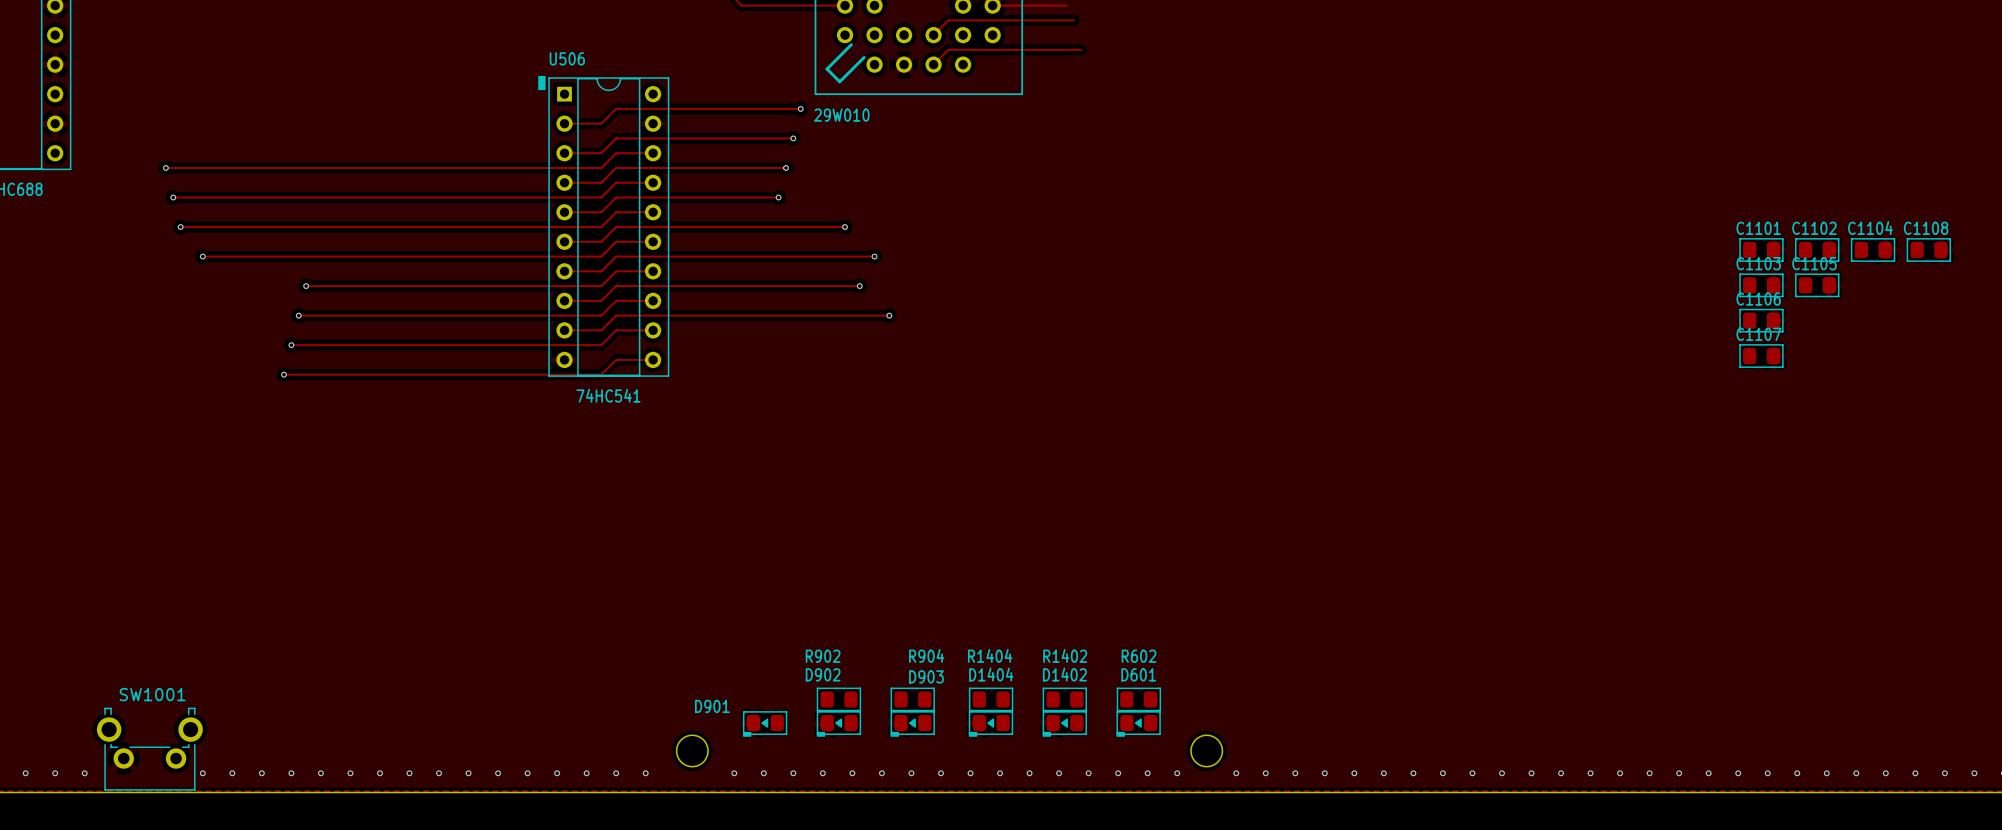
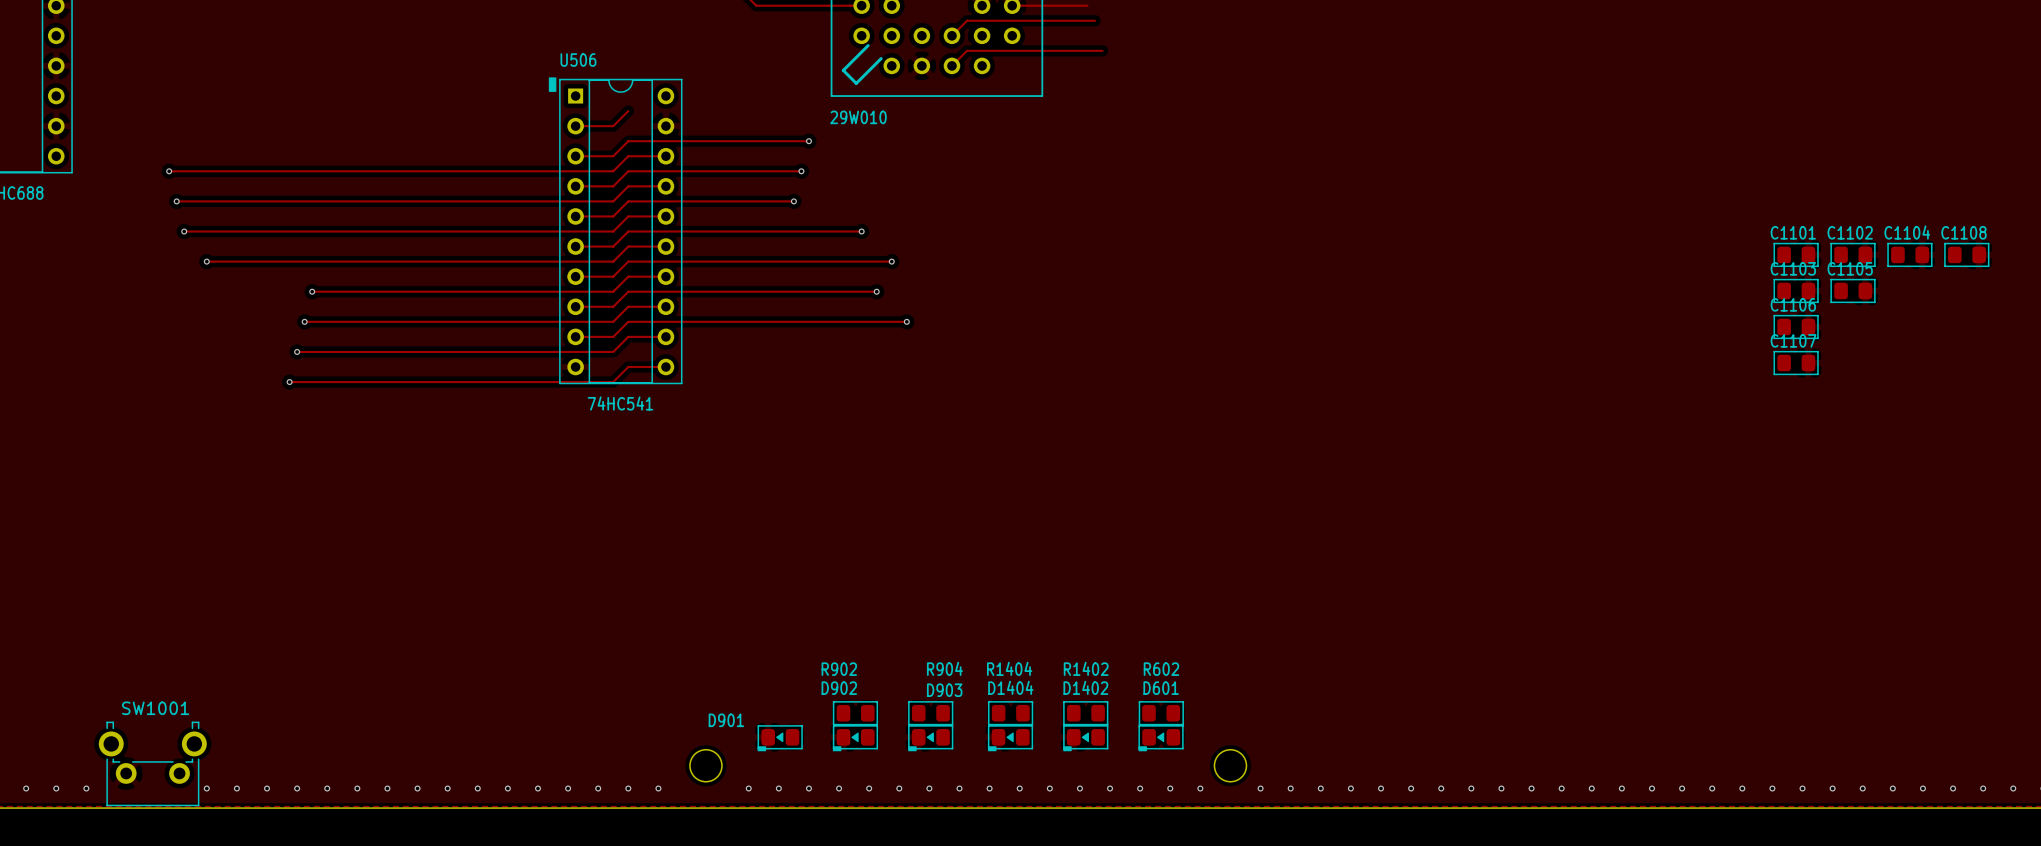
track: (616, 108) (800, 108) -> none
via: (800, 108) -> none

